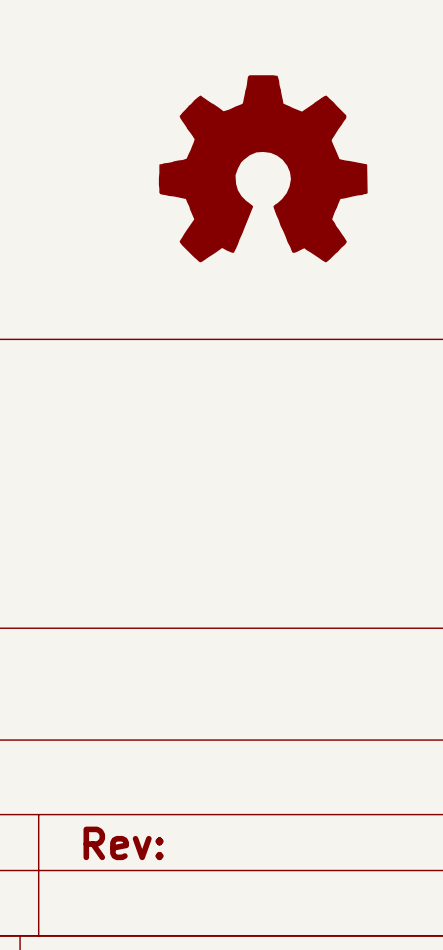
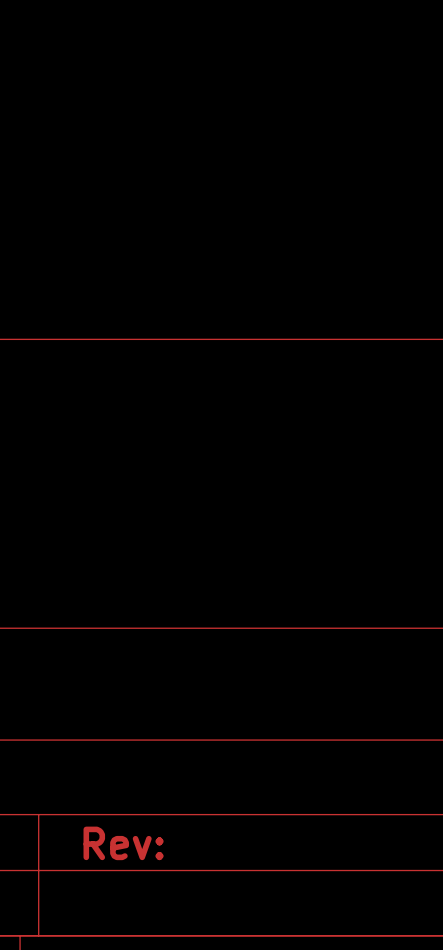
part: (263, 168) -> none

